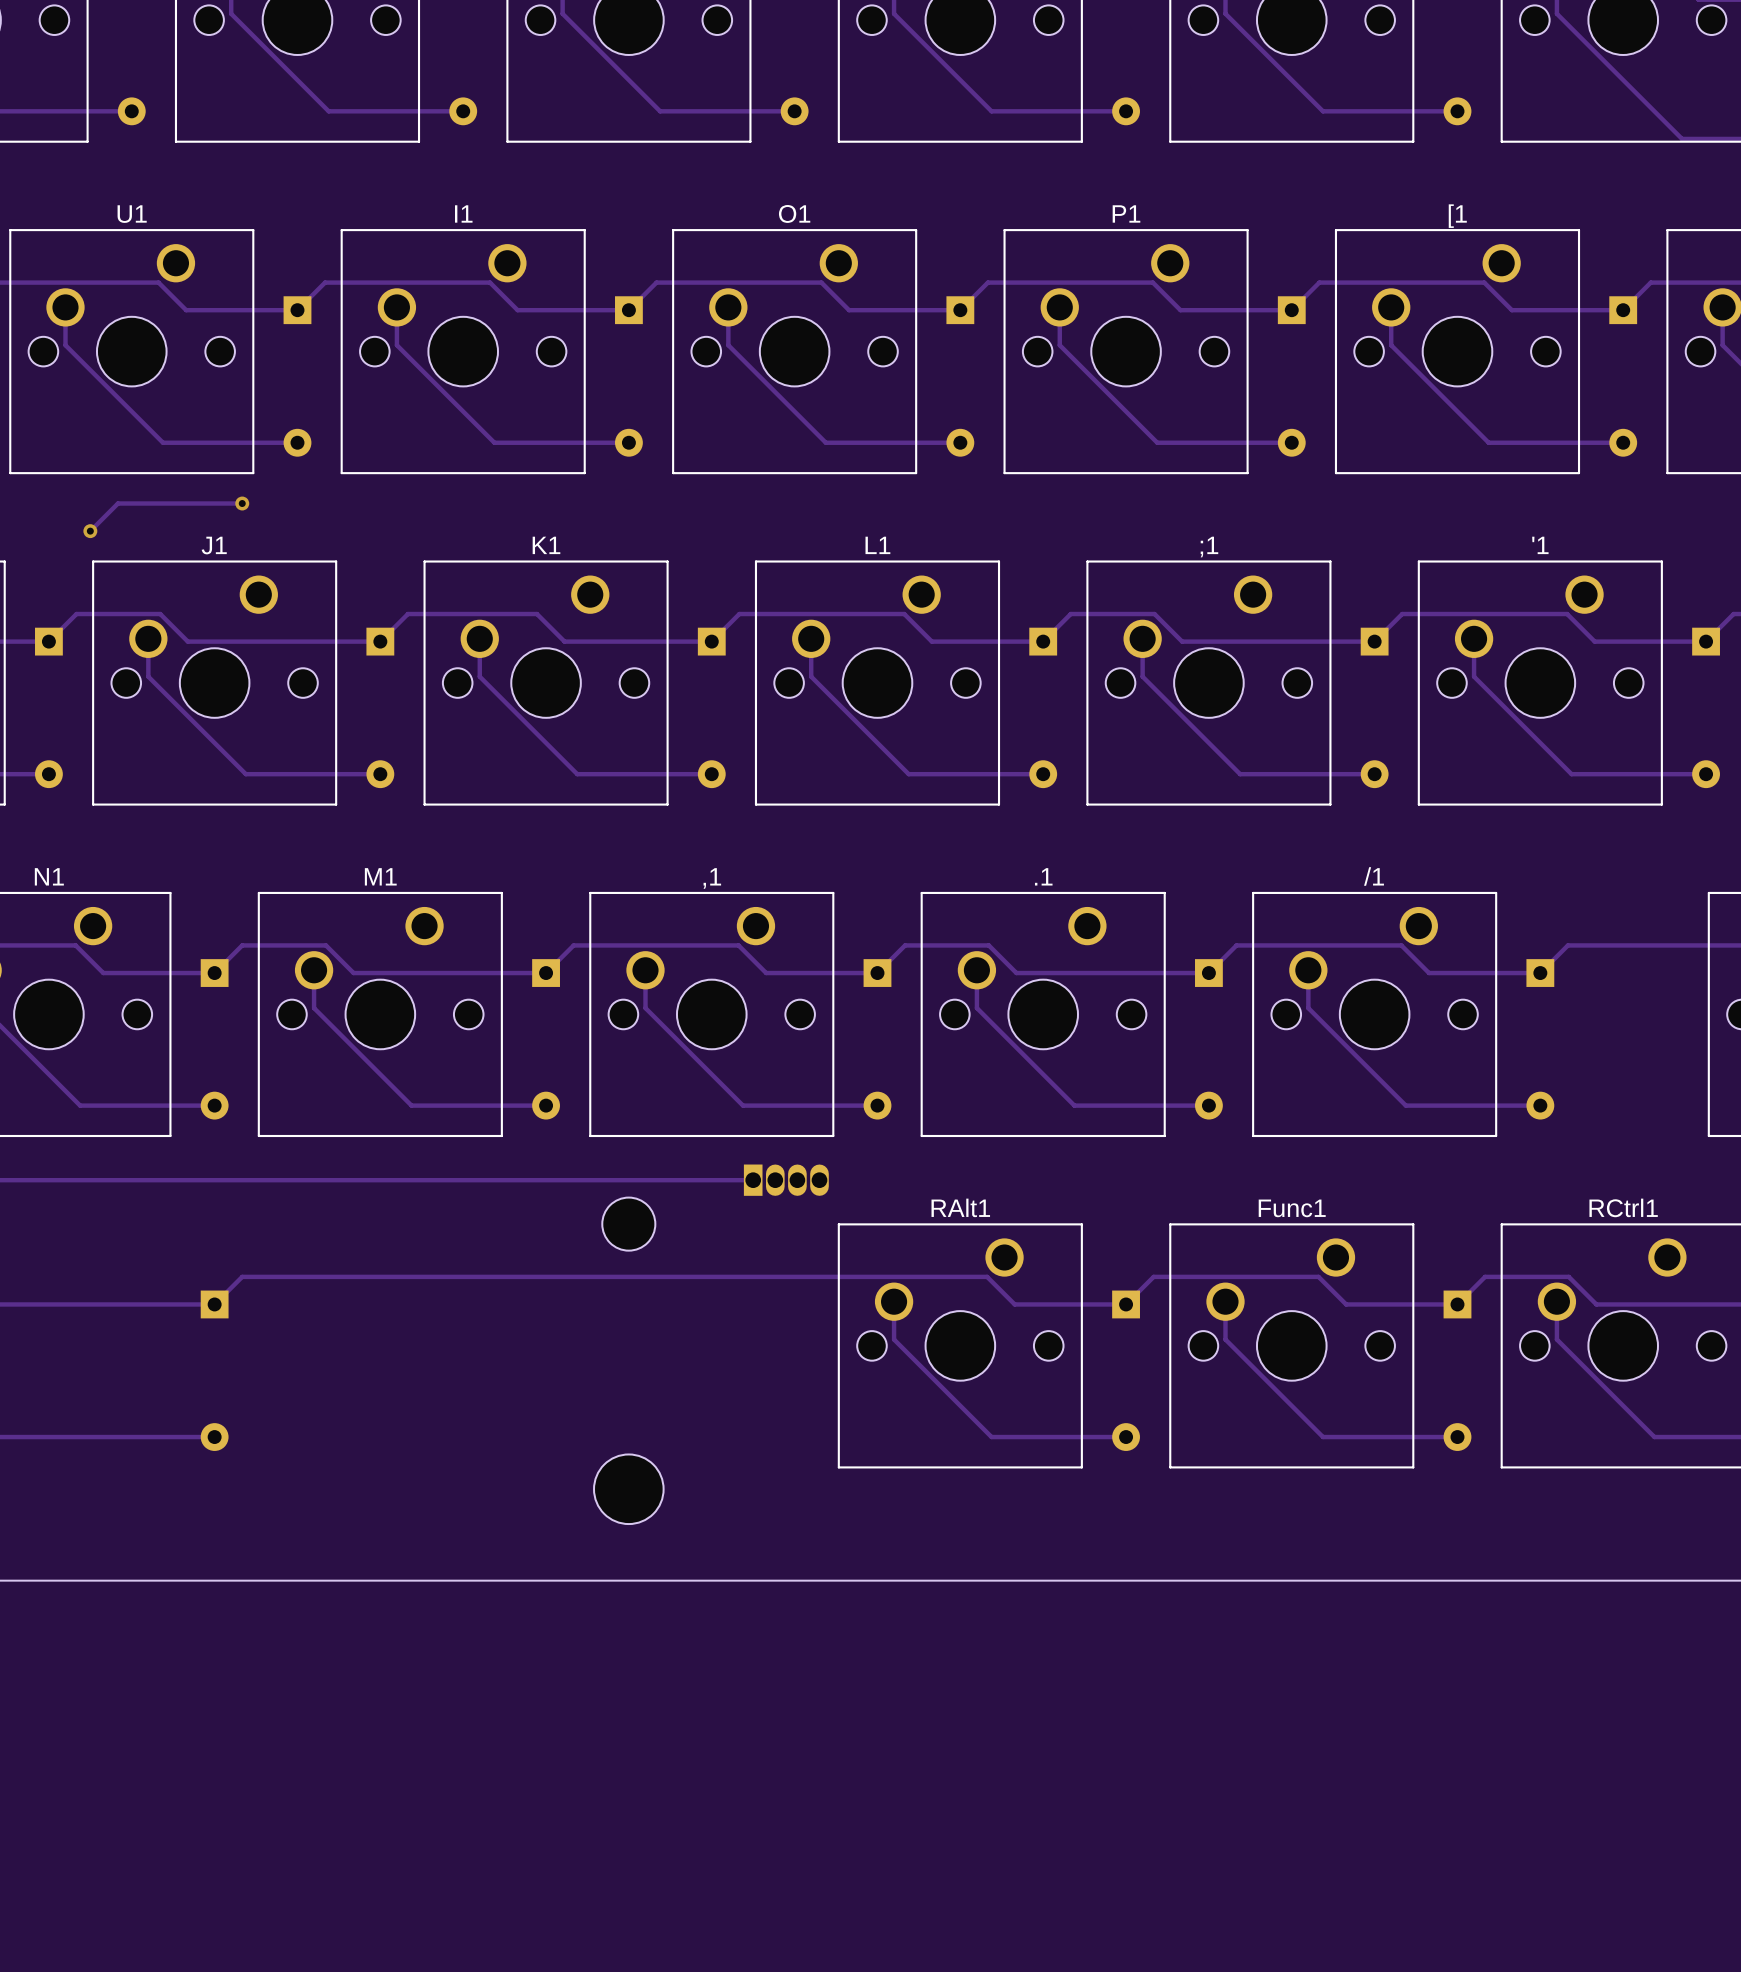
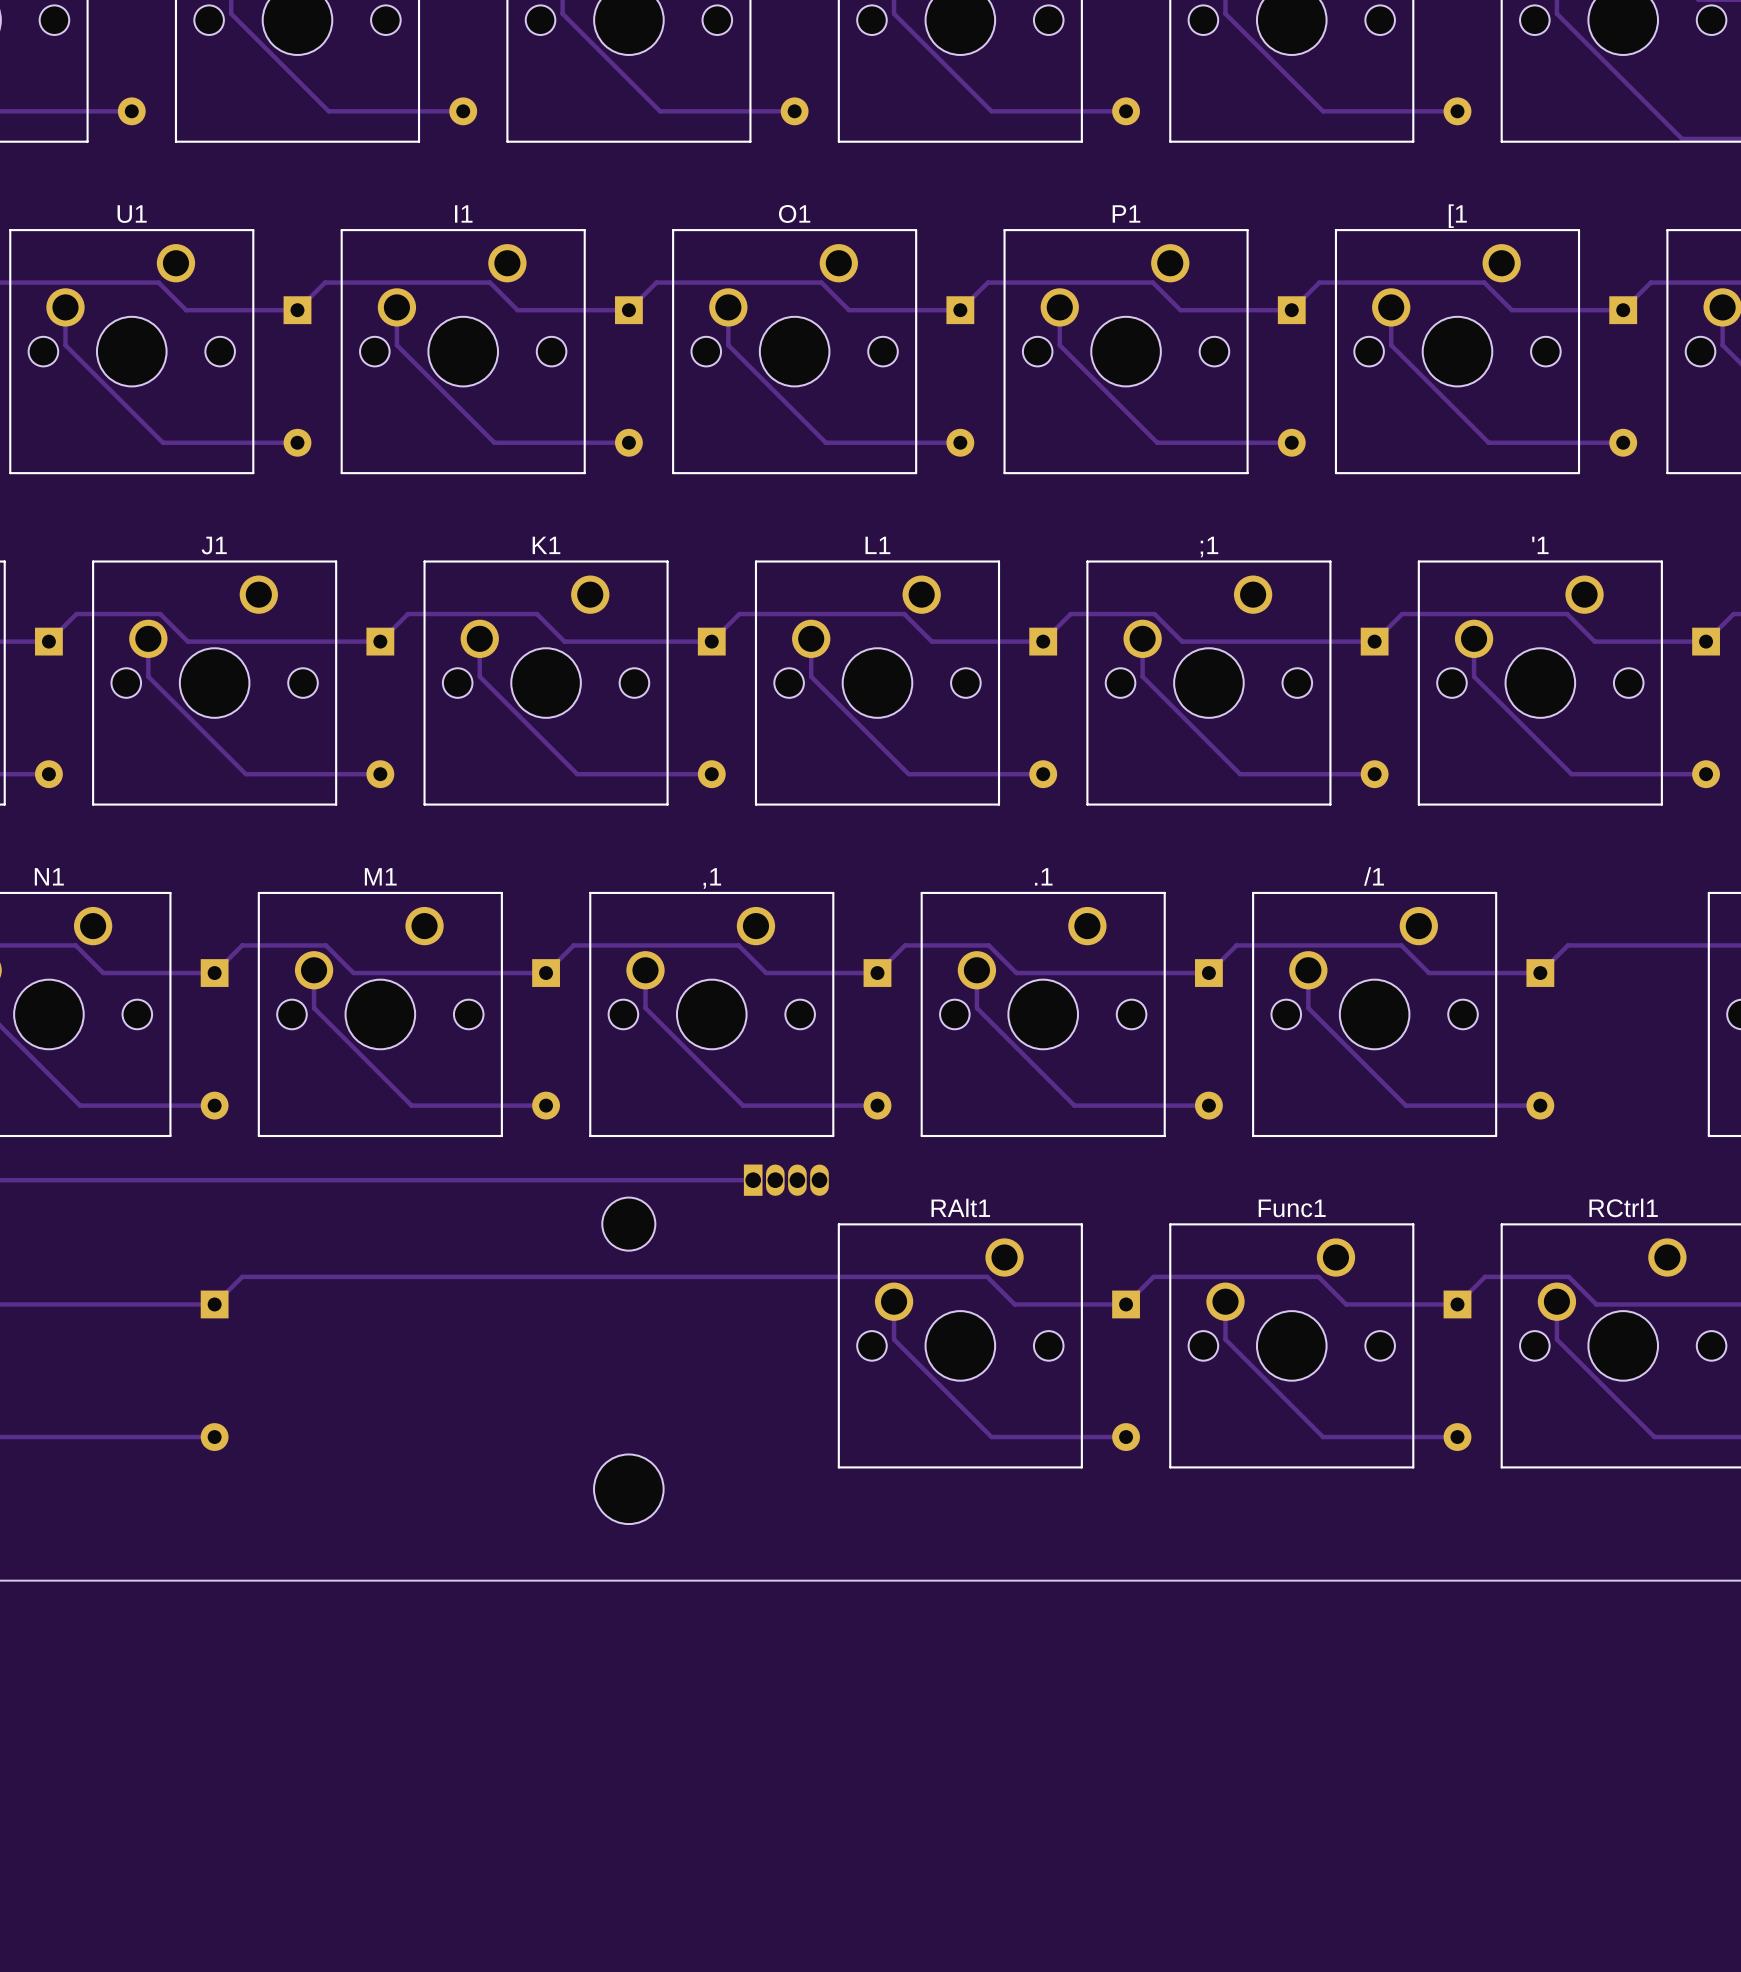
track: (242, 503) (117, 503) (90, 531) -> none
via: (242, 503) -> none
via: (90, 531) -> none

